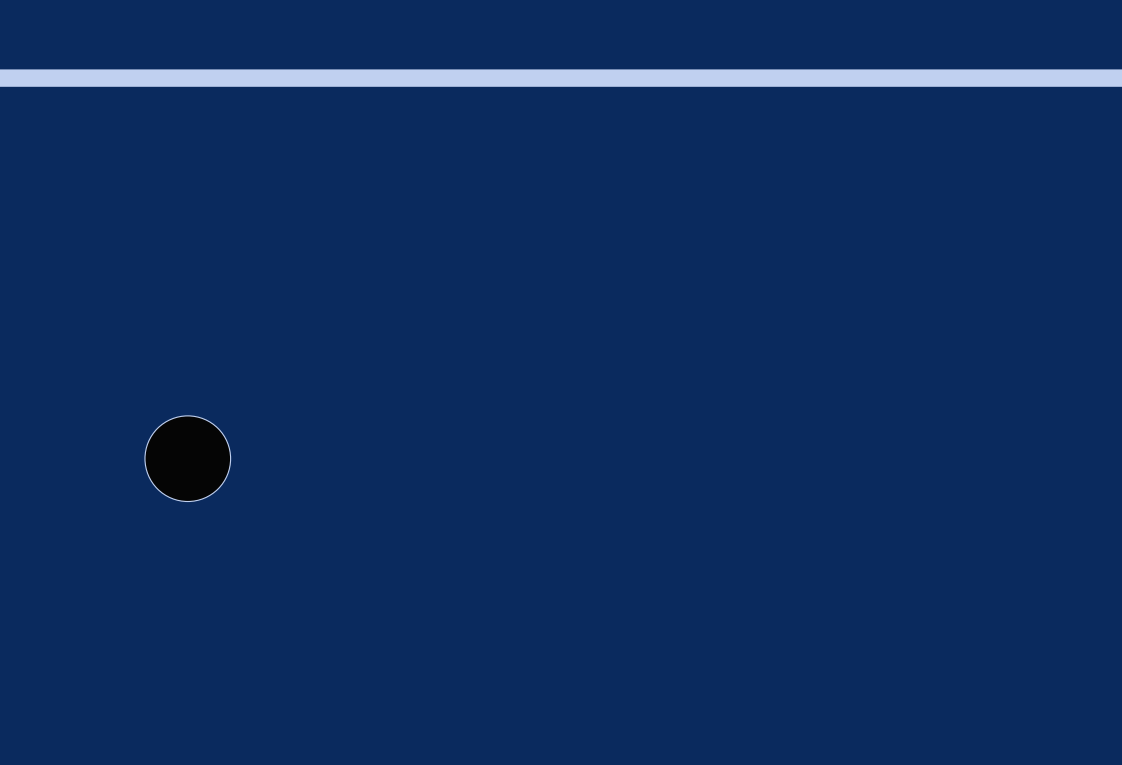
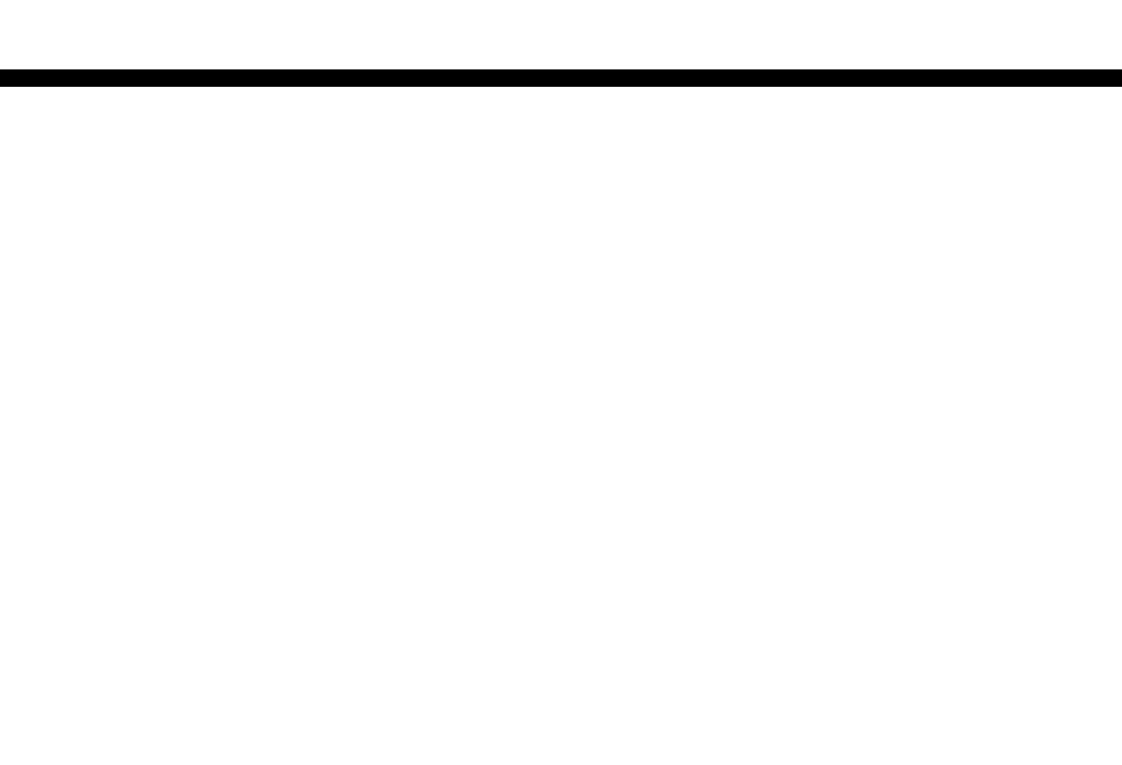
hole: (187, 458) -> none

